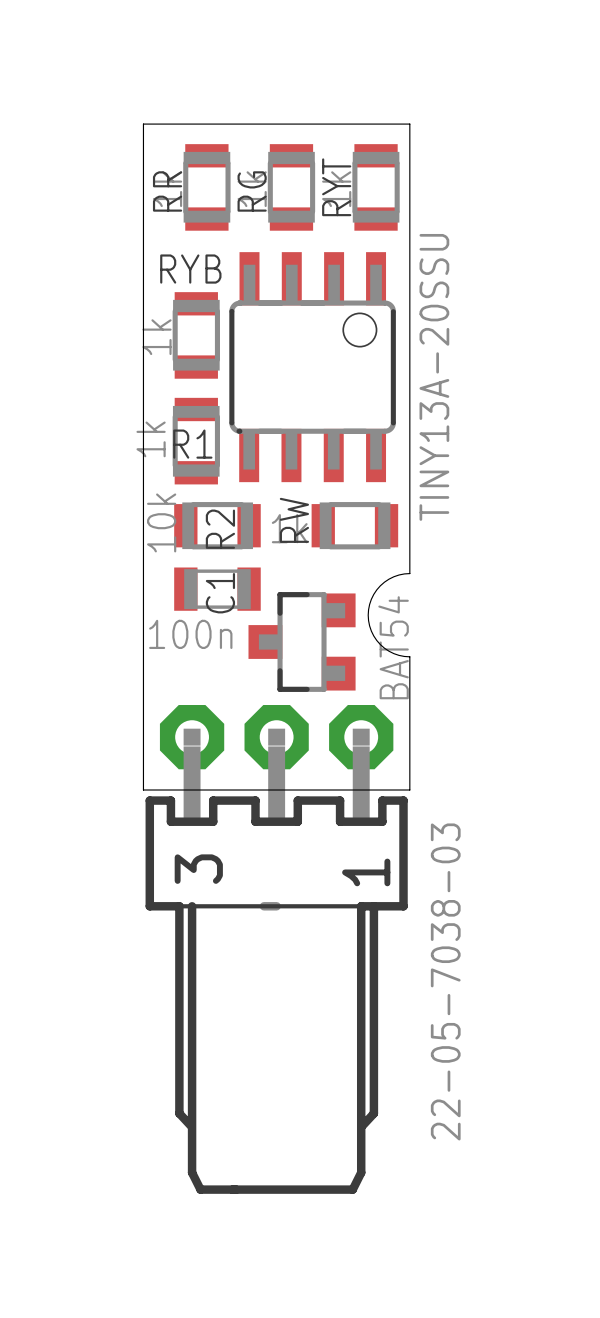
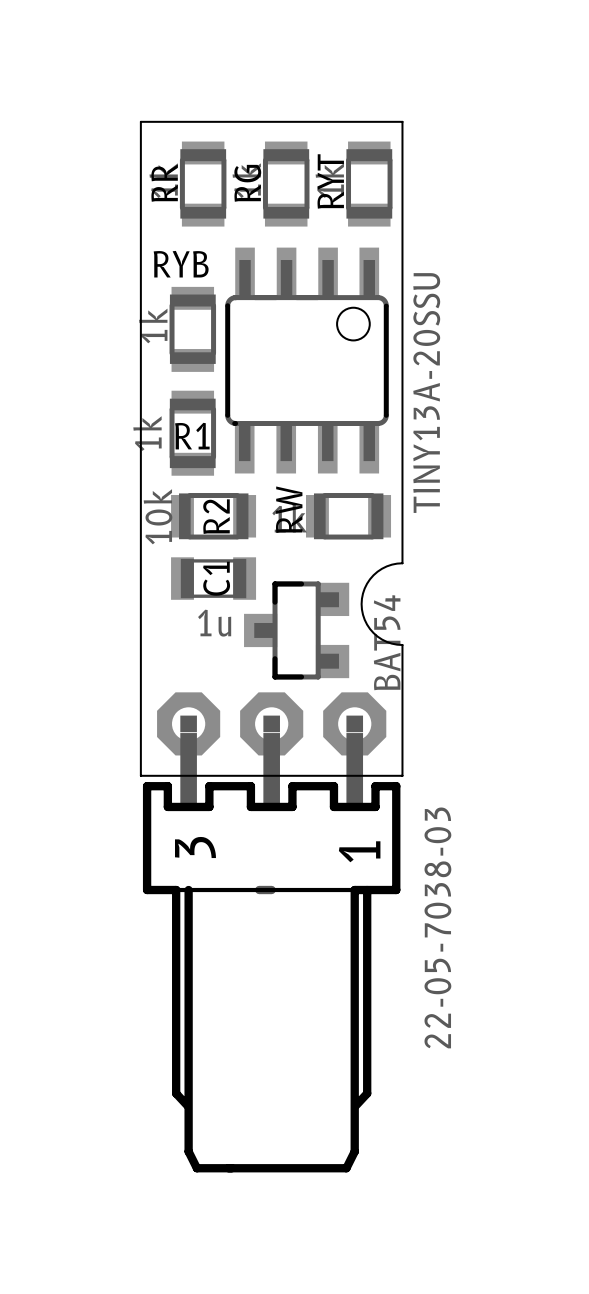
C1 value: 100n (190, 634) -> 1u (214, 623)

